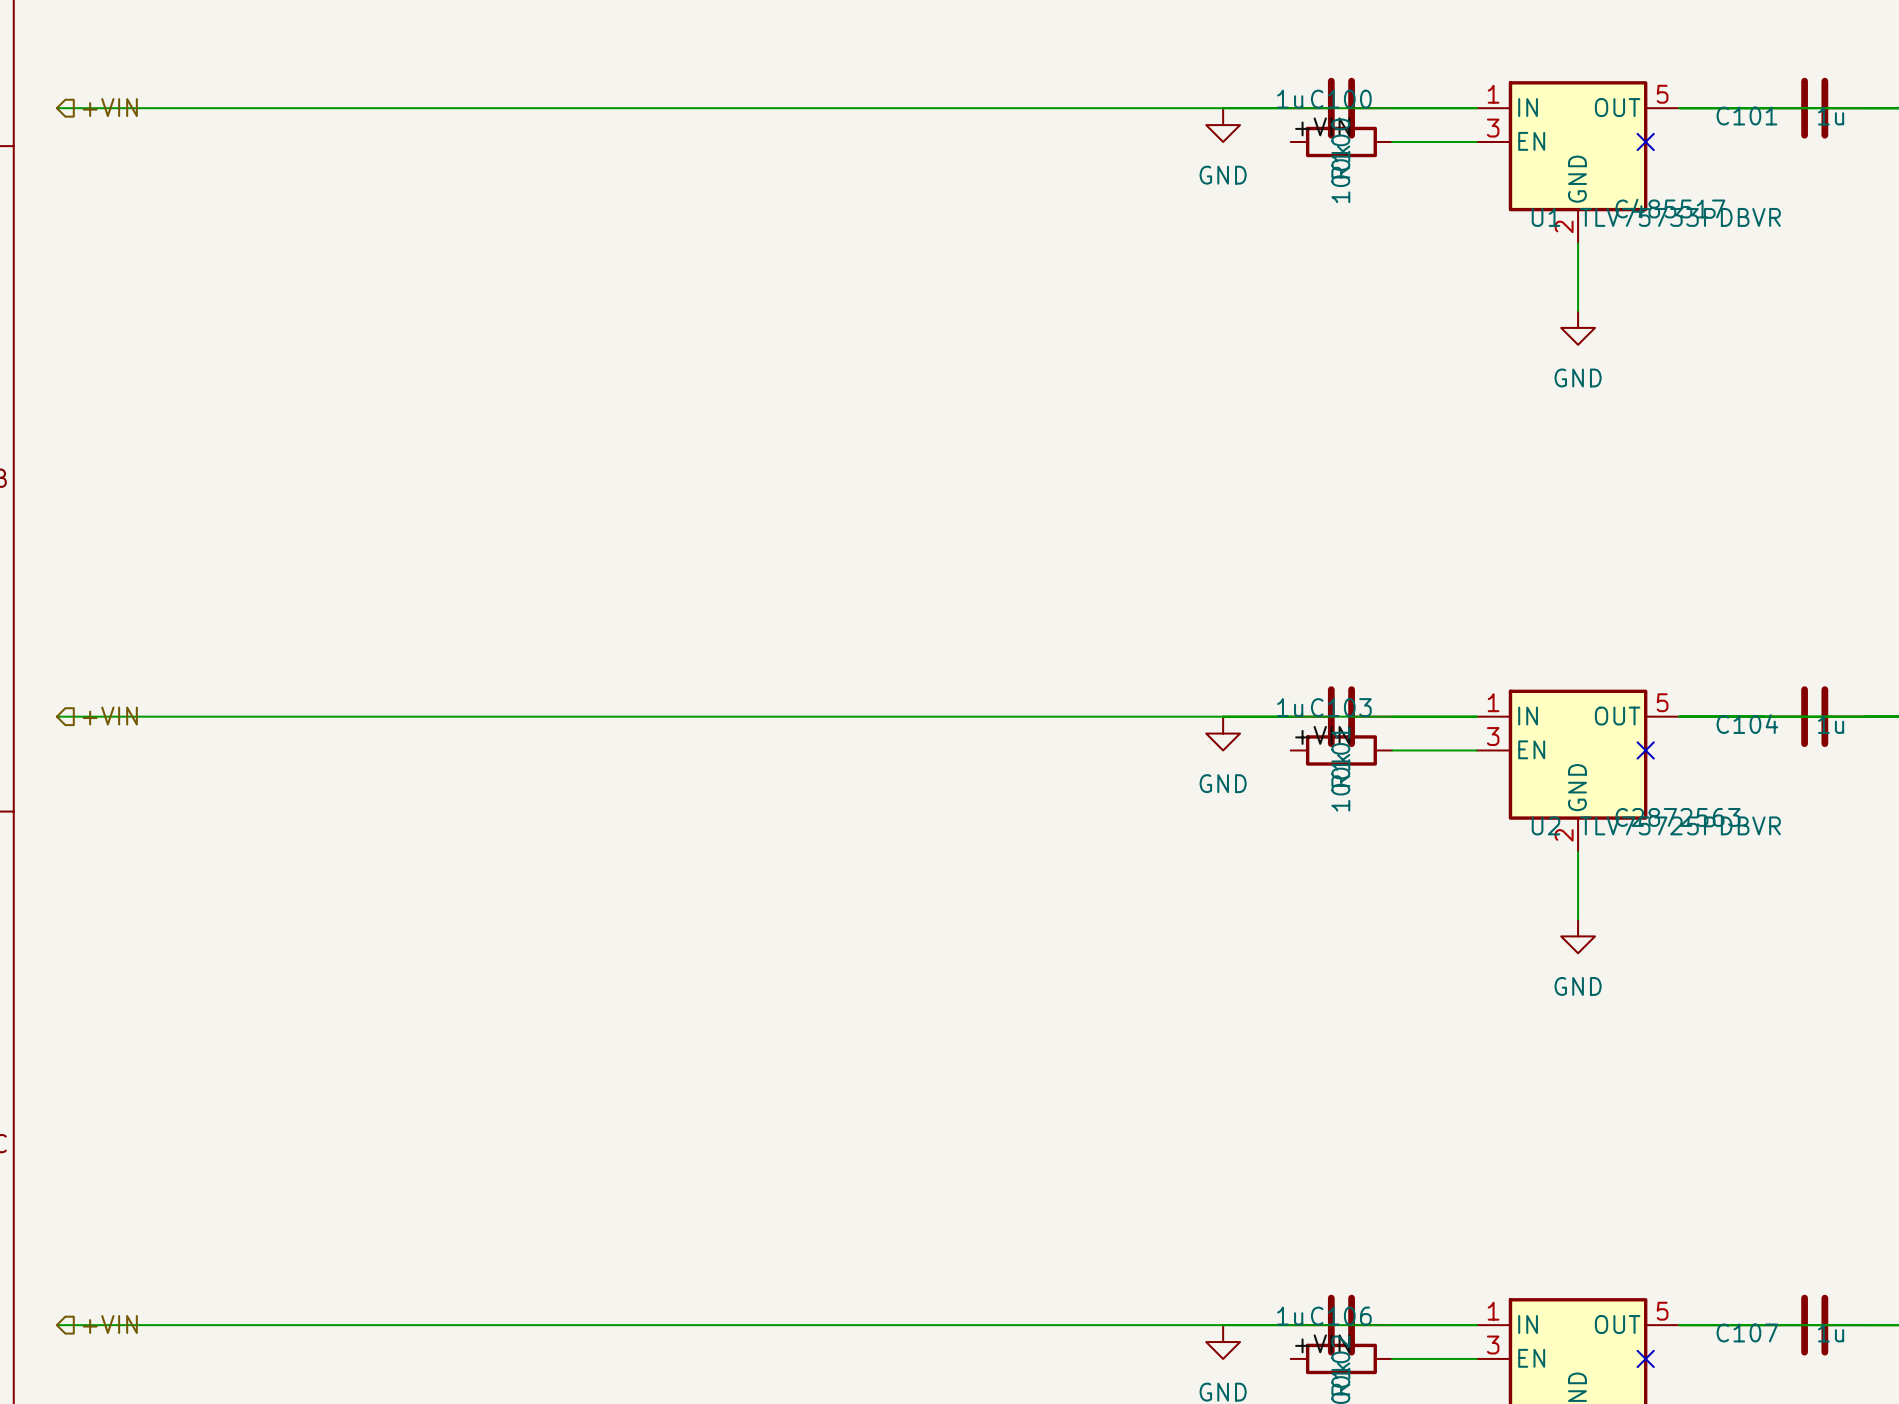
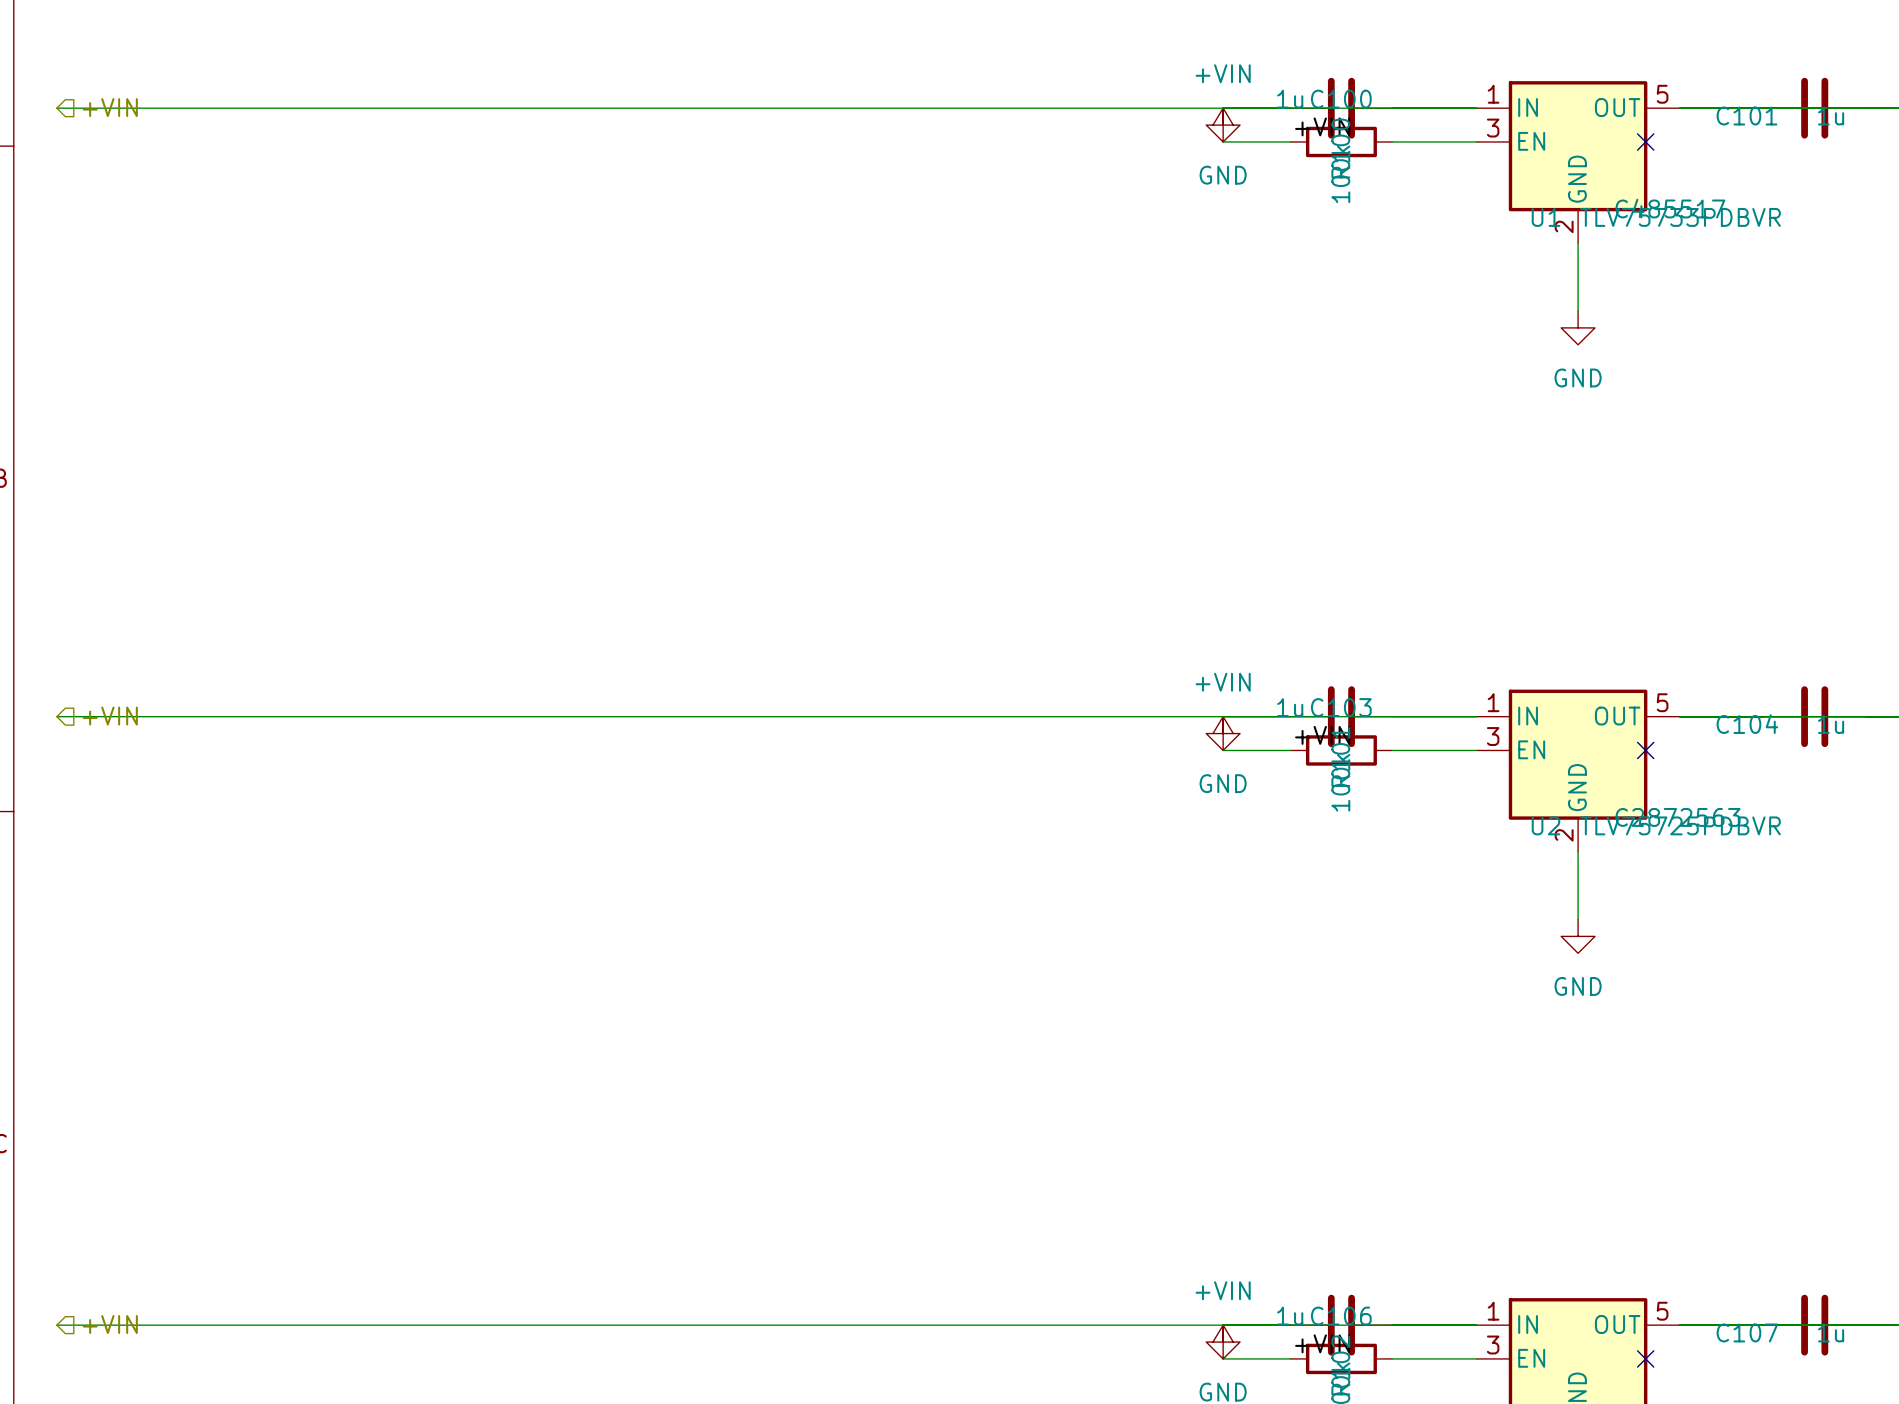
power symbol: none -> +VIN (1223, 125)
wire: none -> (1223, 141) (1290, 141)
power symbol: none -> +VIN (1223, 733)
wire: none -> (1223, 750) (1290, 750)
power symbol: none -> +VIN (1223, 1342)
wire: none -> (1223, 1358) (1290, 1358)

